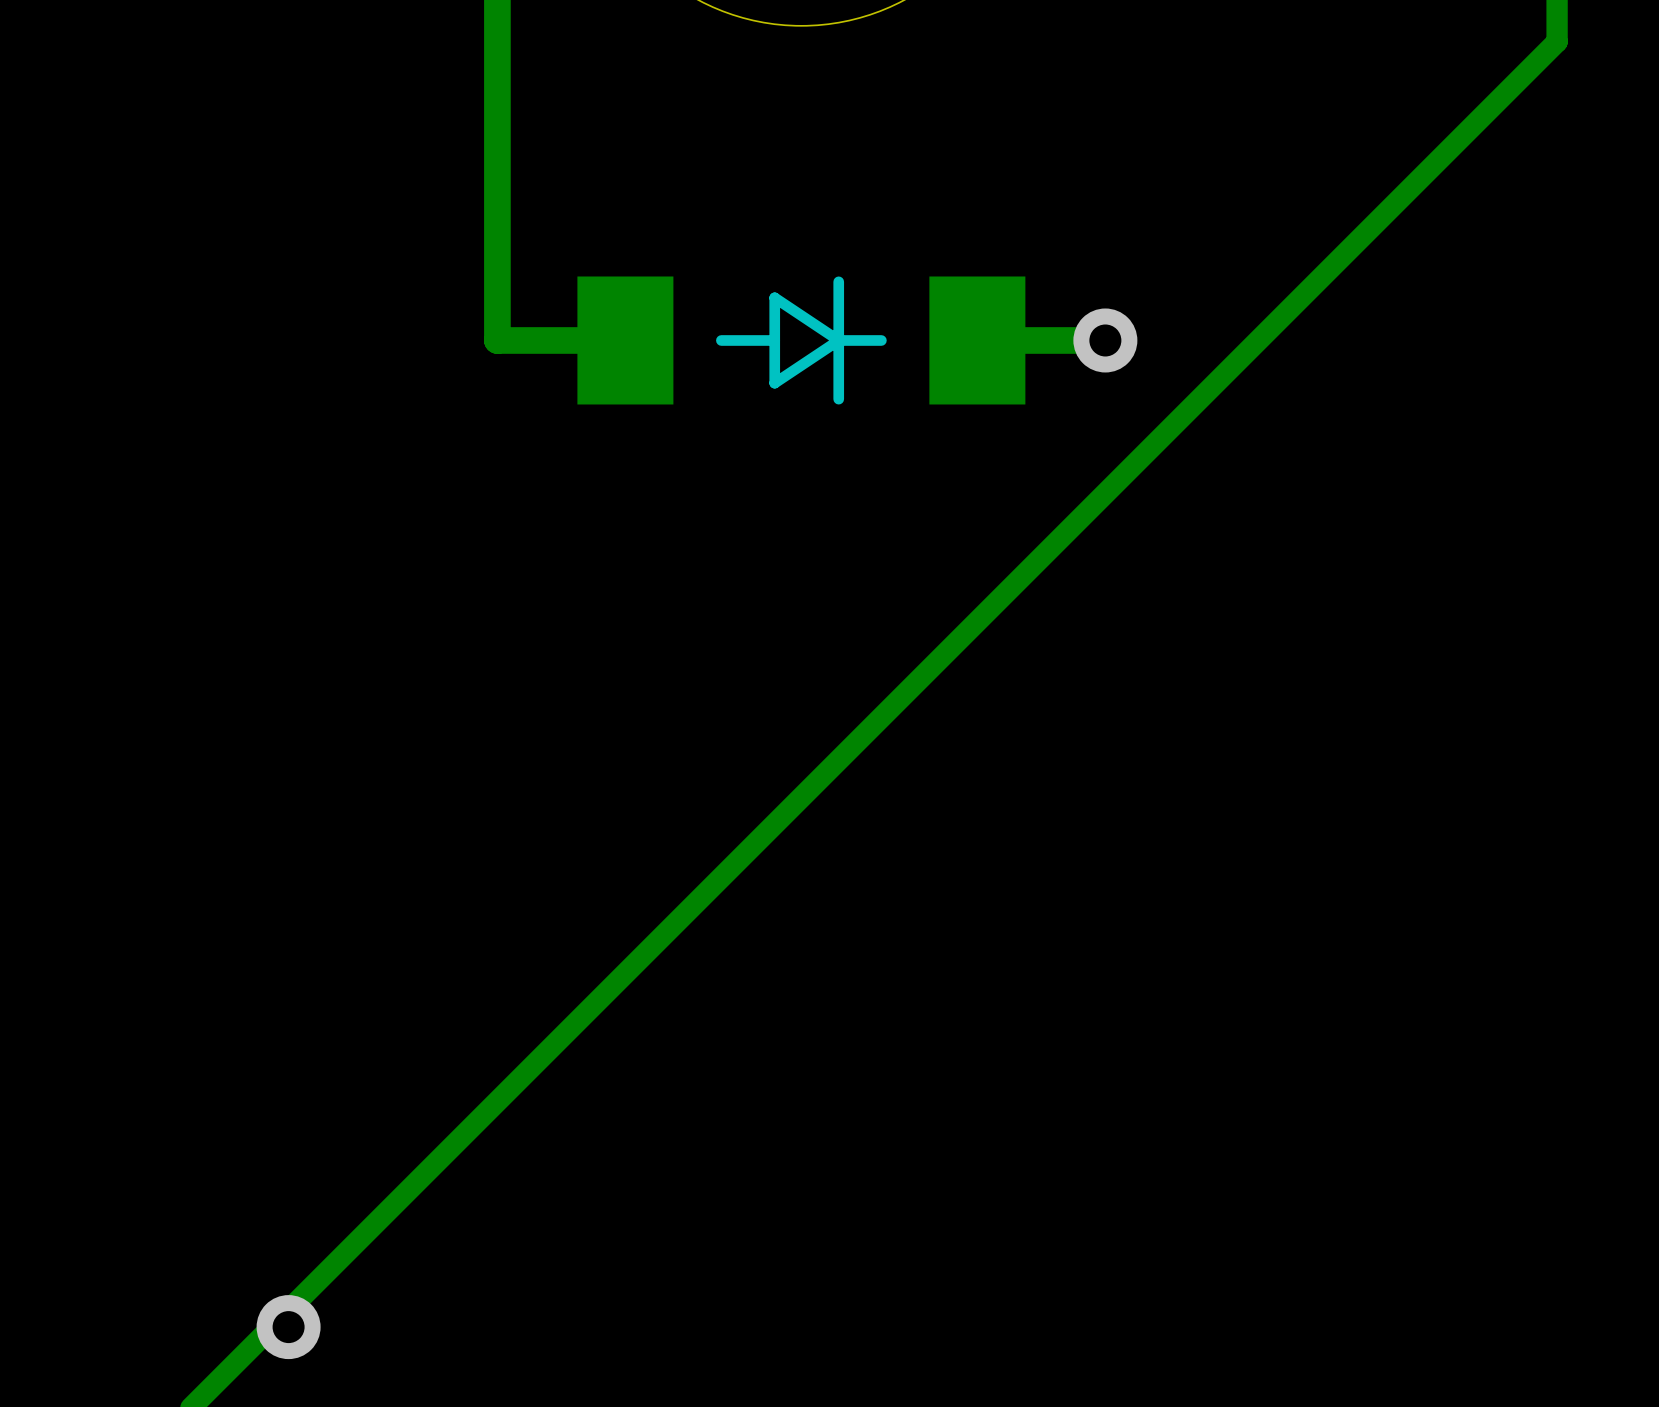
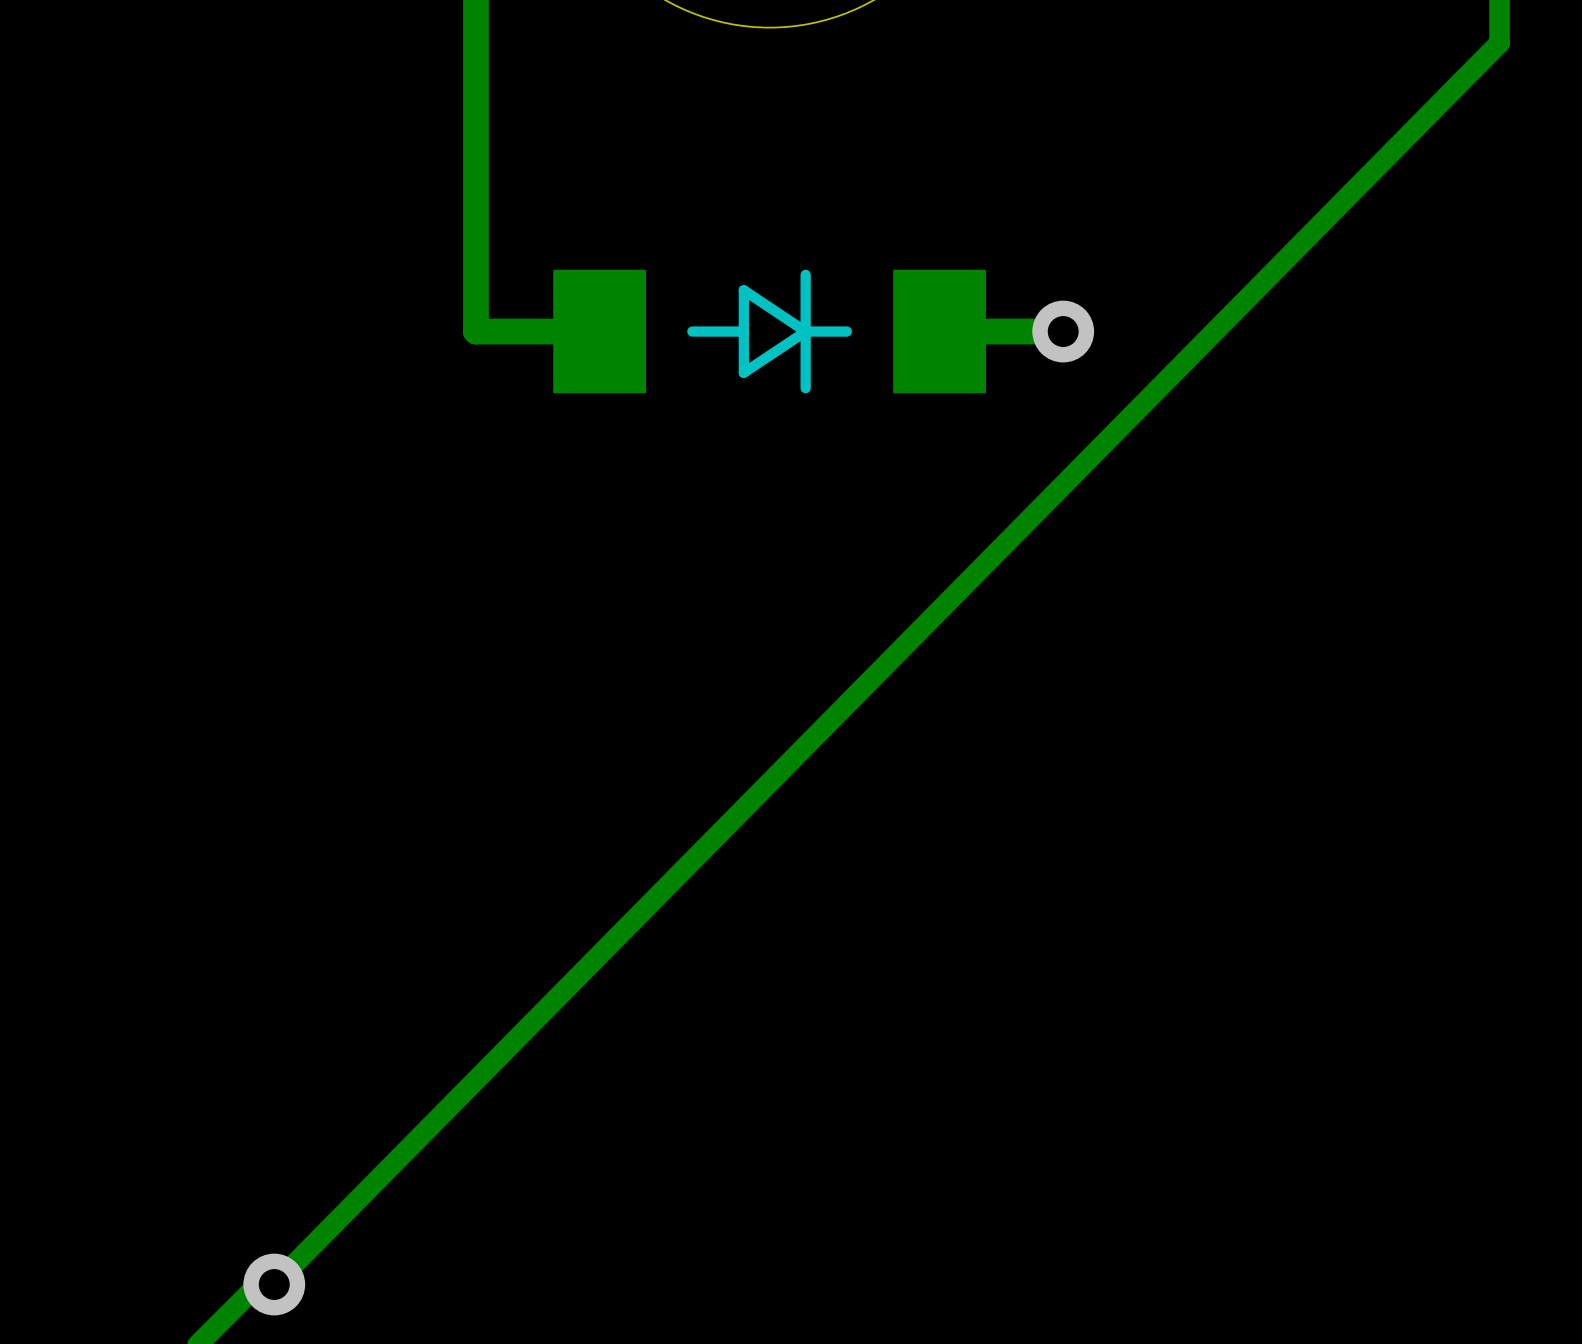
track: (1557, 41) (288, 1310) (288, 1327) (271, 1327) -> (1499, 43) (274, 1284)

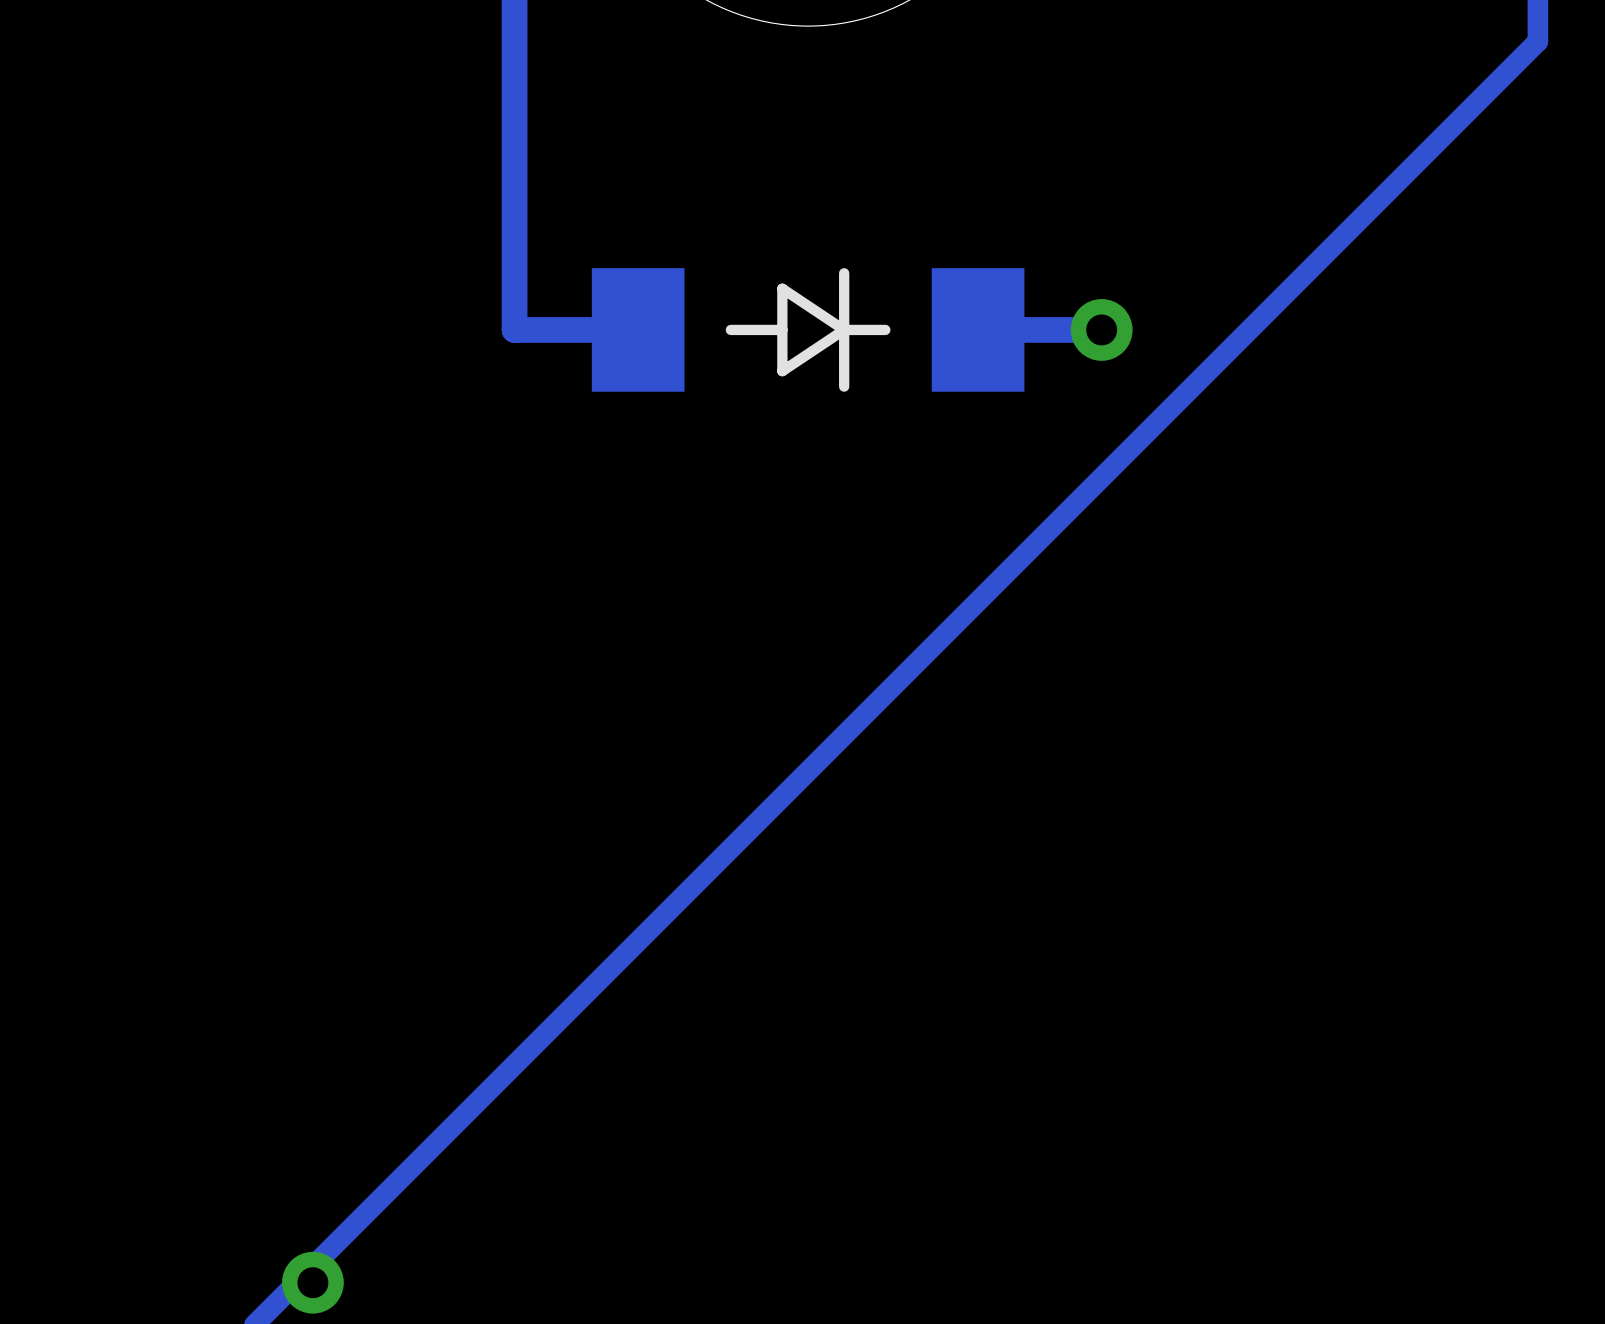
track: (1499, 43) (274, 1284) -> (1537, 41) (312, 1266) (312, 1282) (296, 1282)

